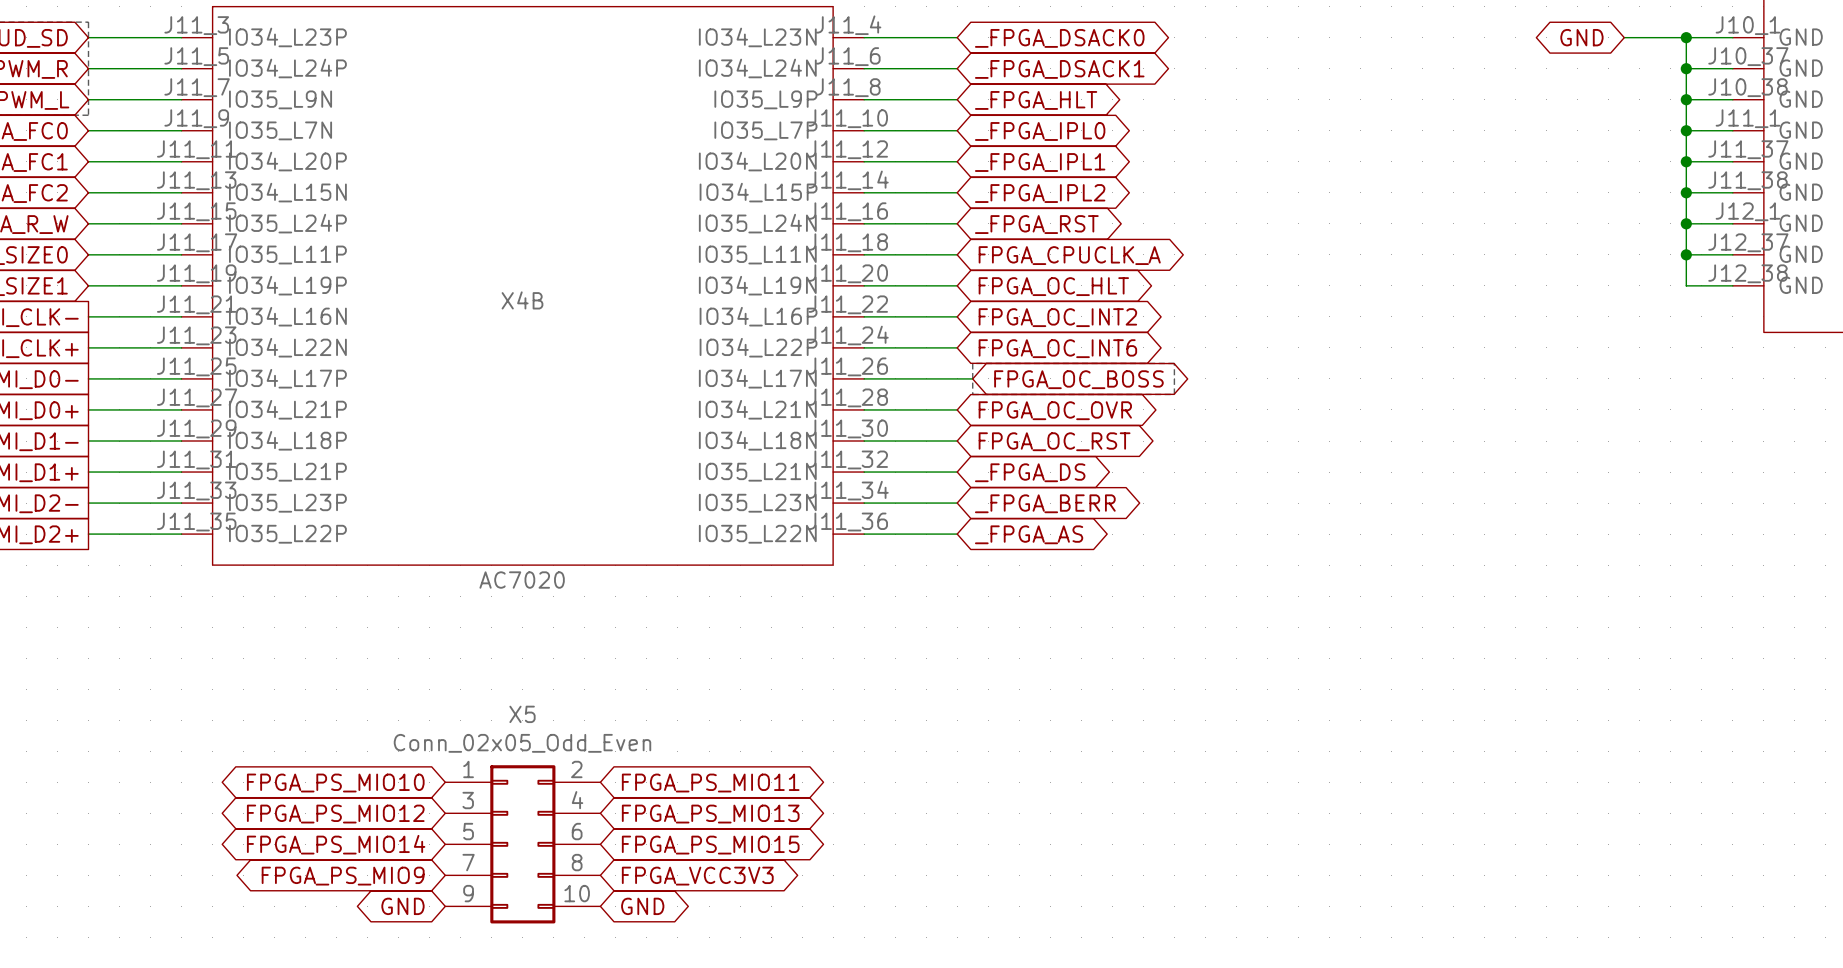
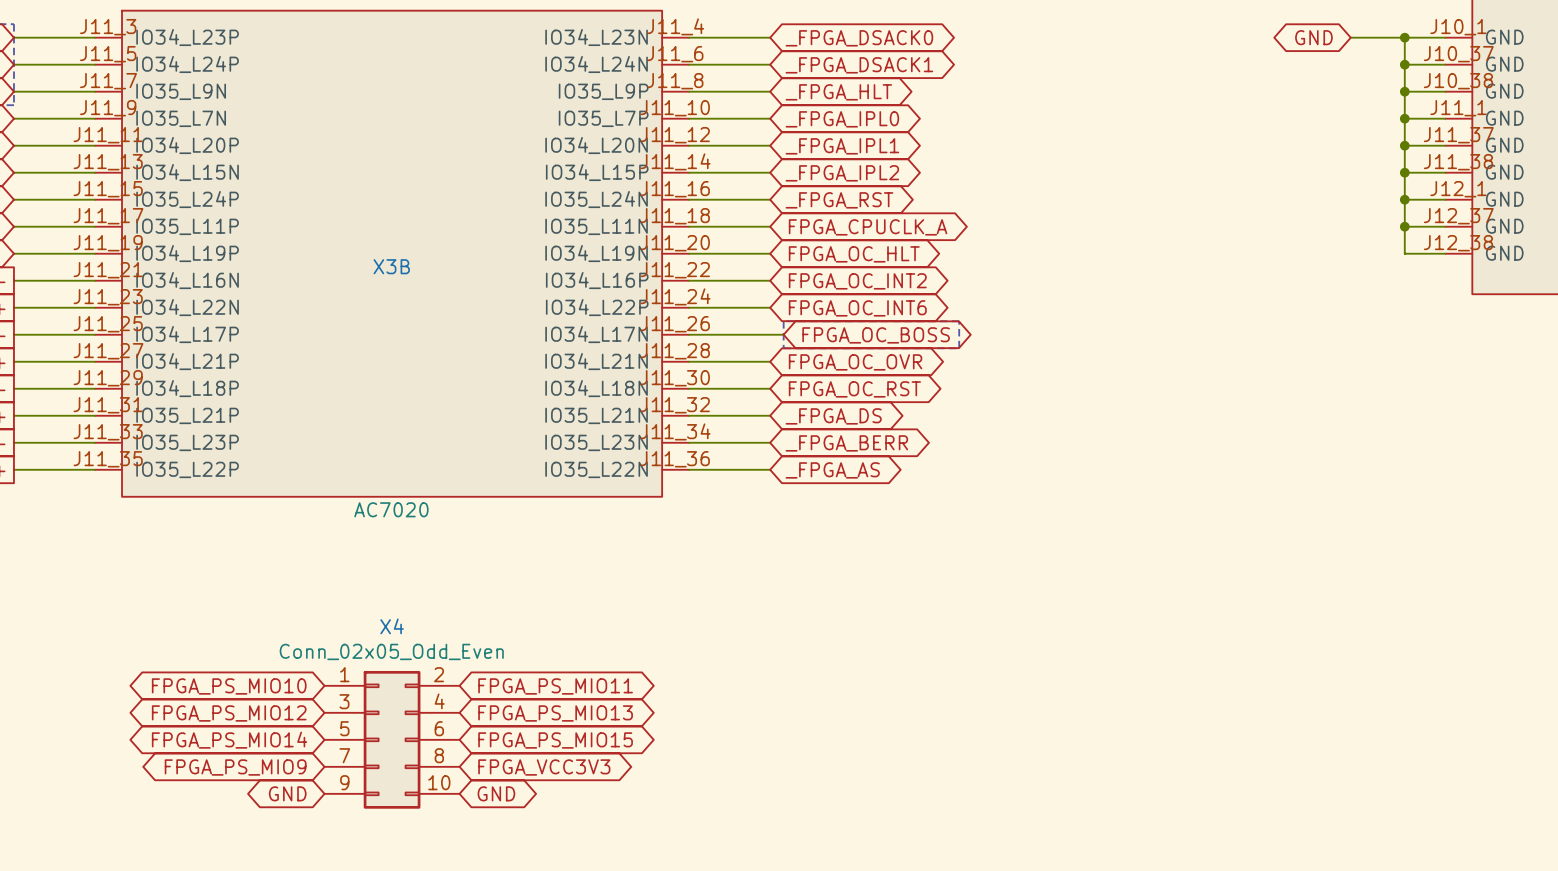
X4B name: X4B (522, 300) -> X3B (391, 266)
X5 name: X5 (522, 714) -> X4 (392, 626)

